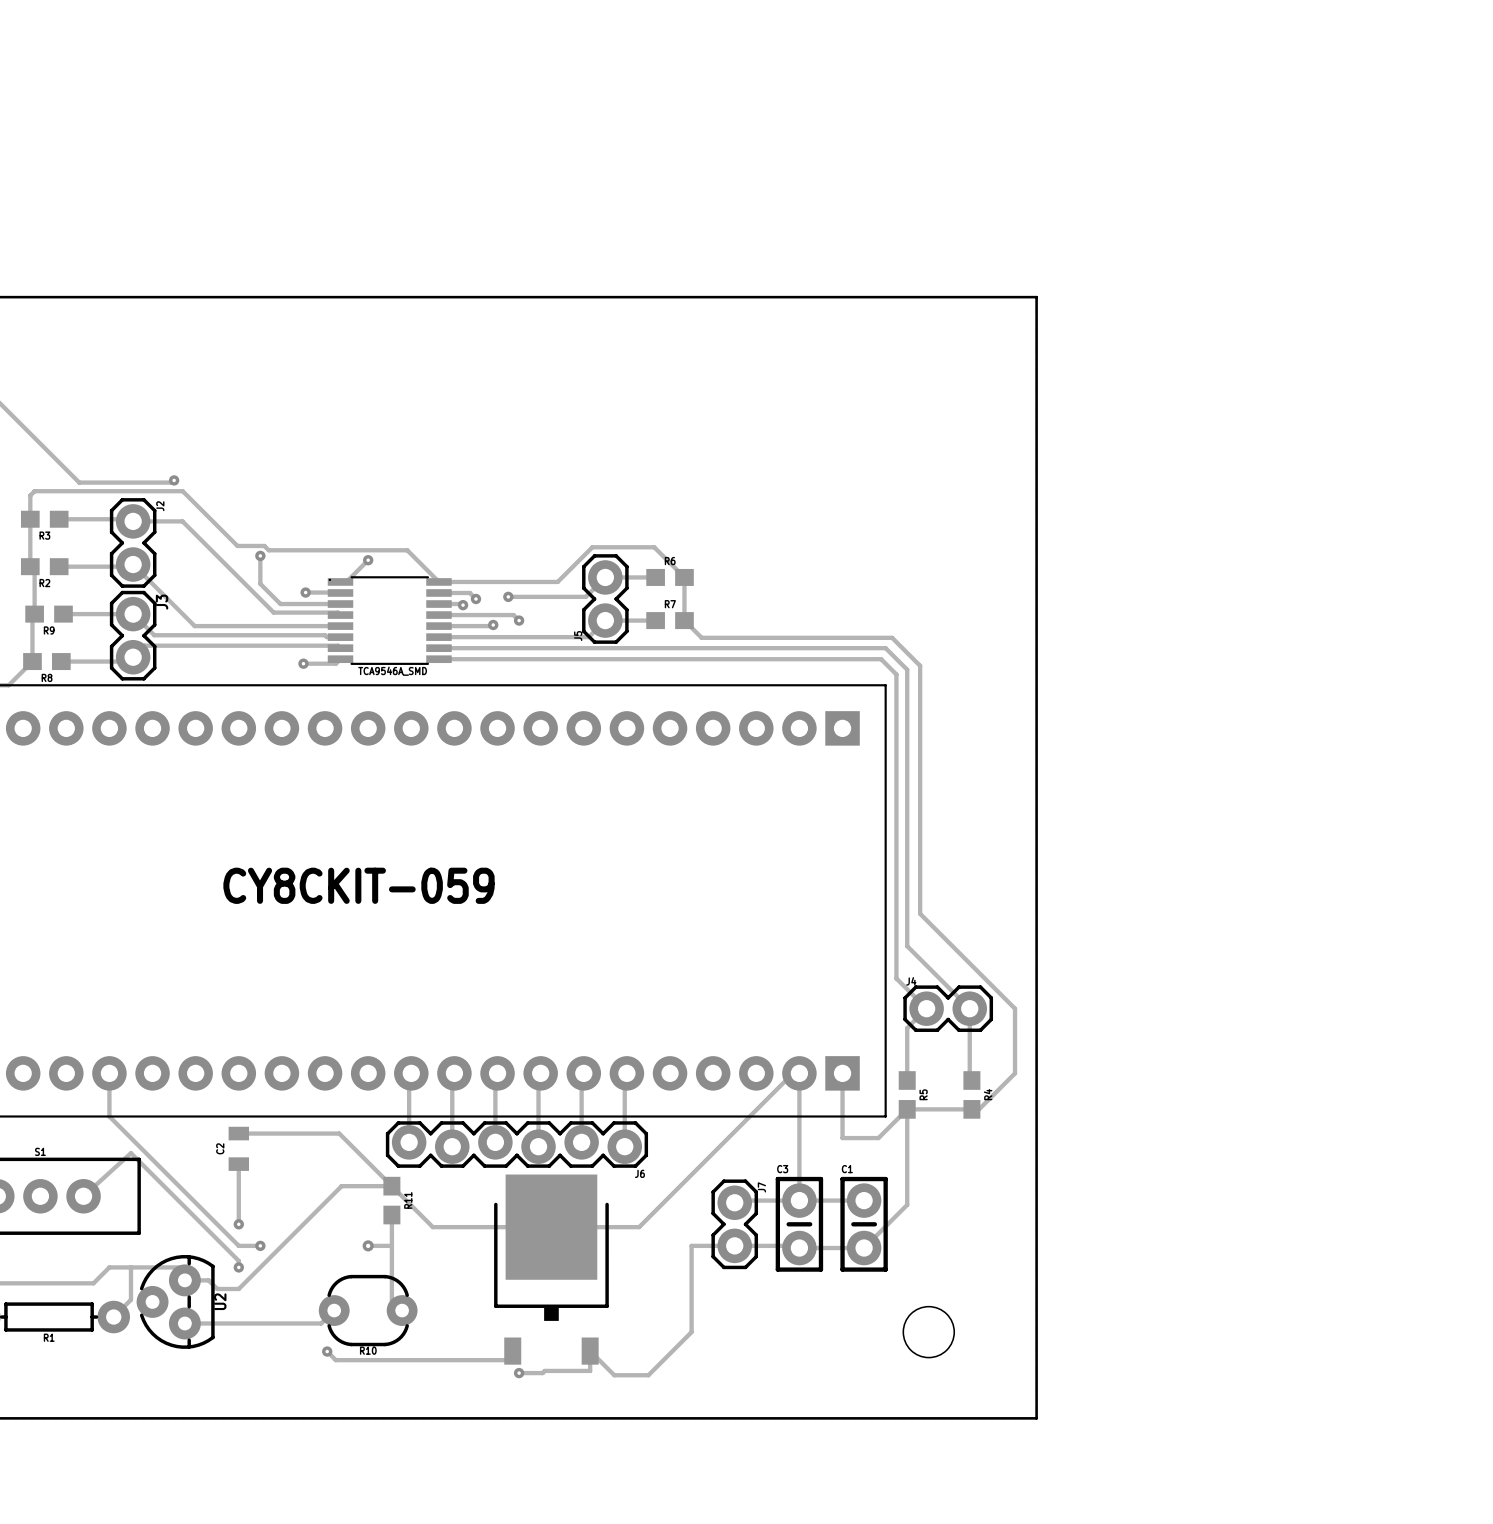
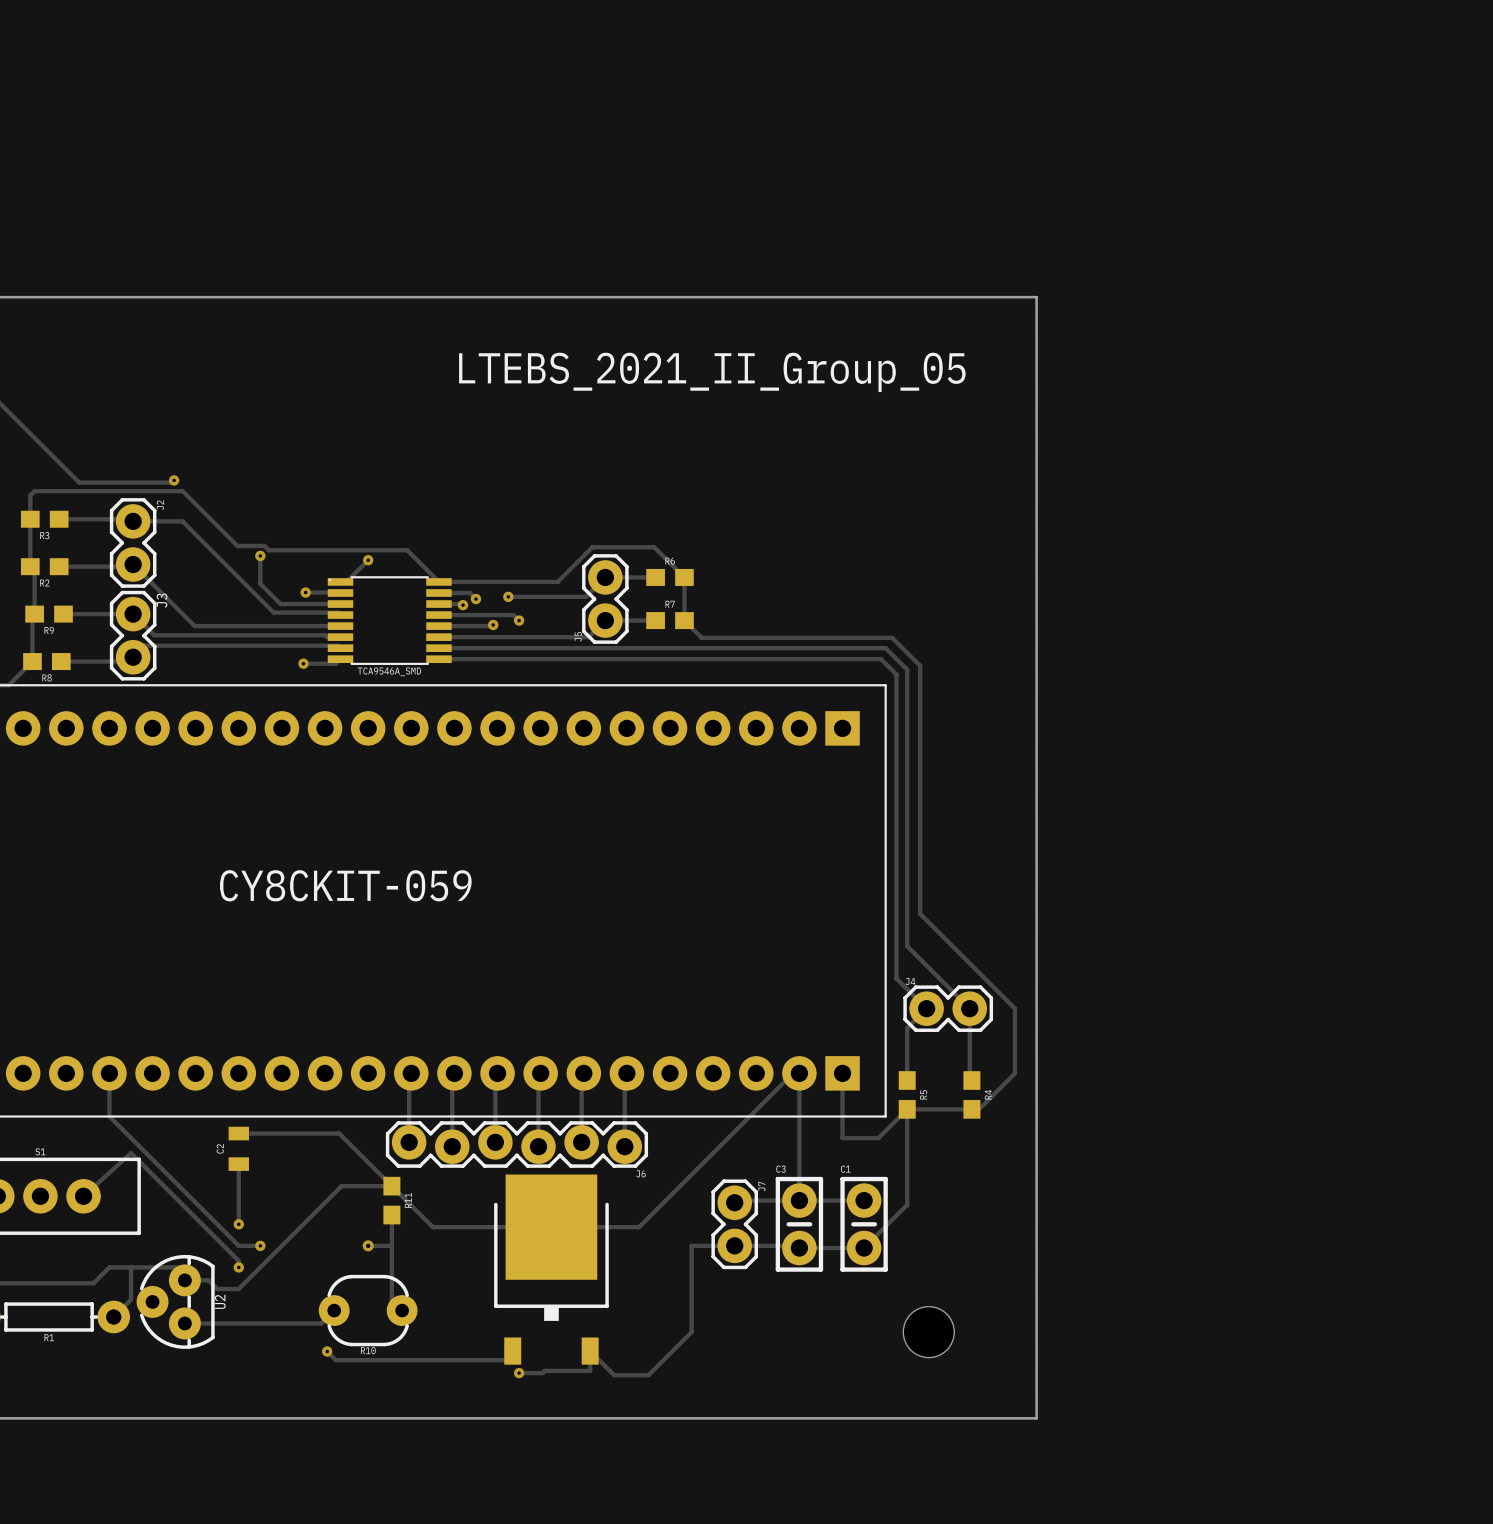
text: none -> LTEBS_2021_II_Group_05 (712, 372)

